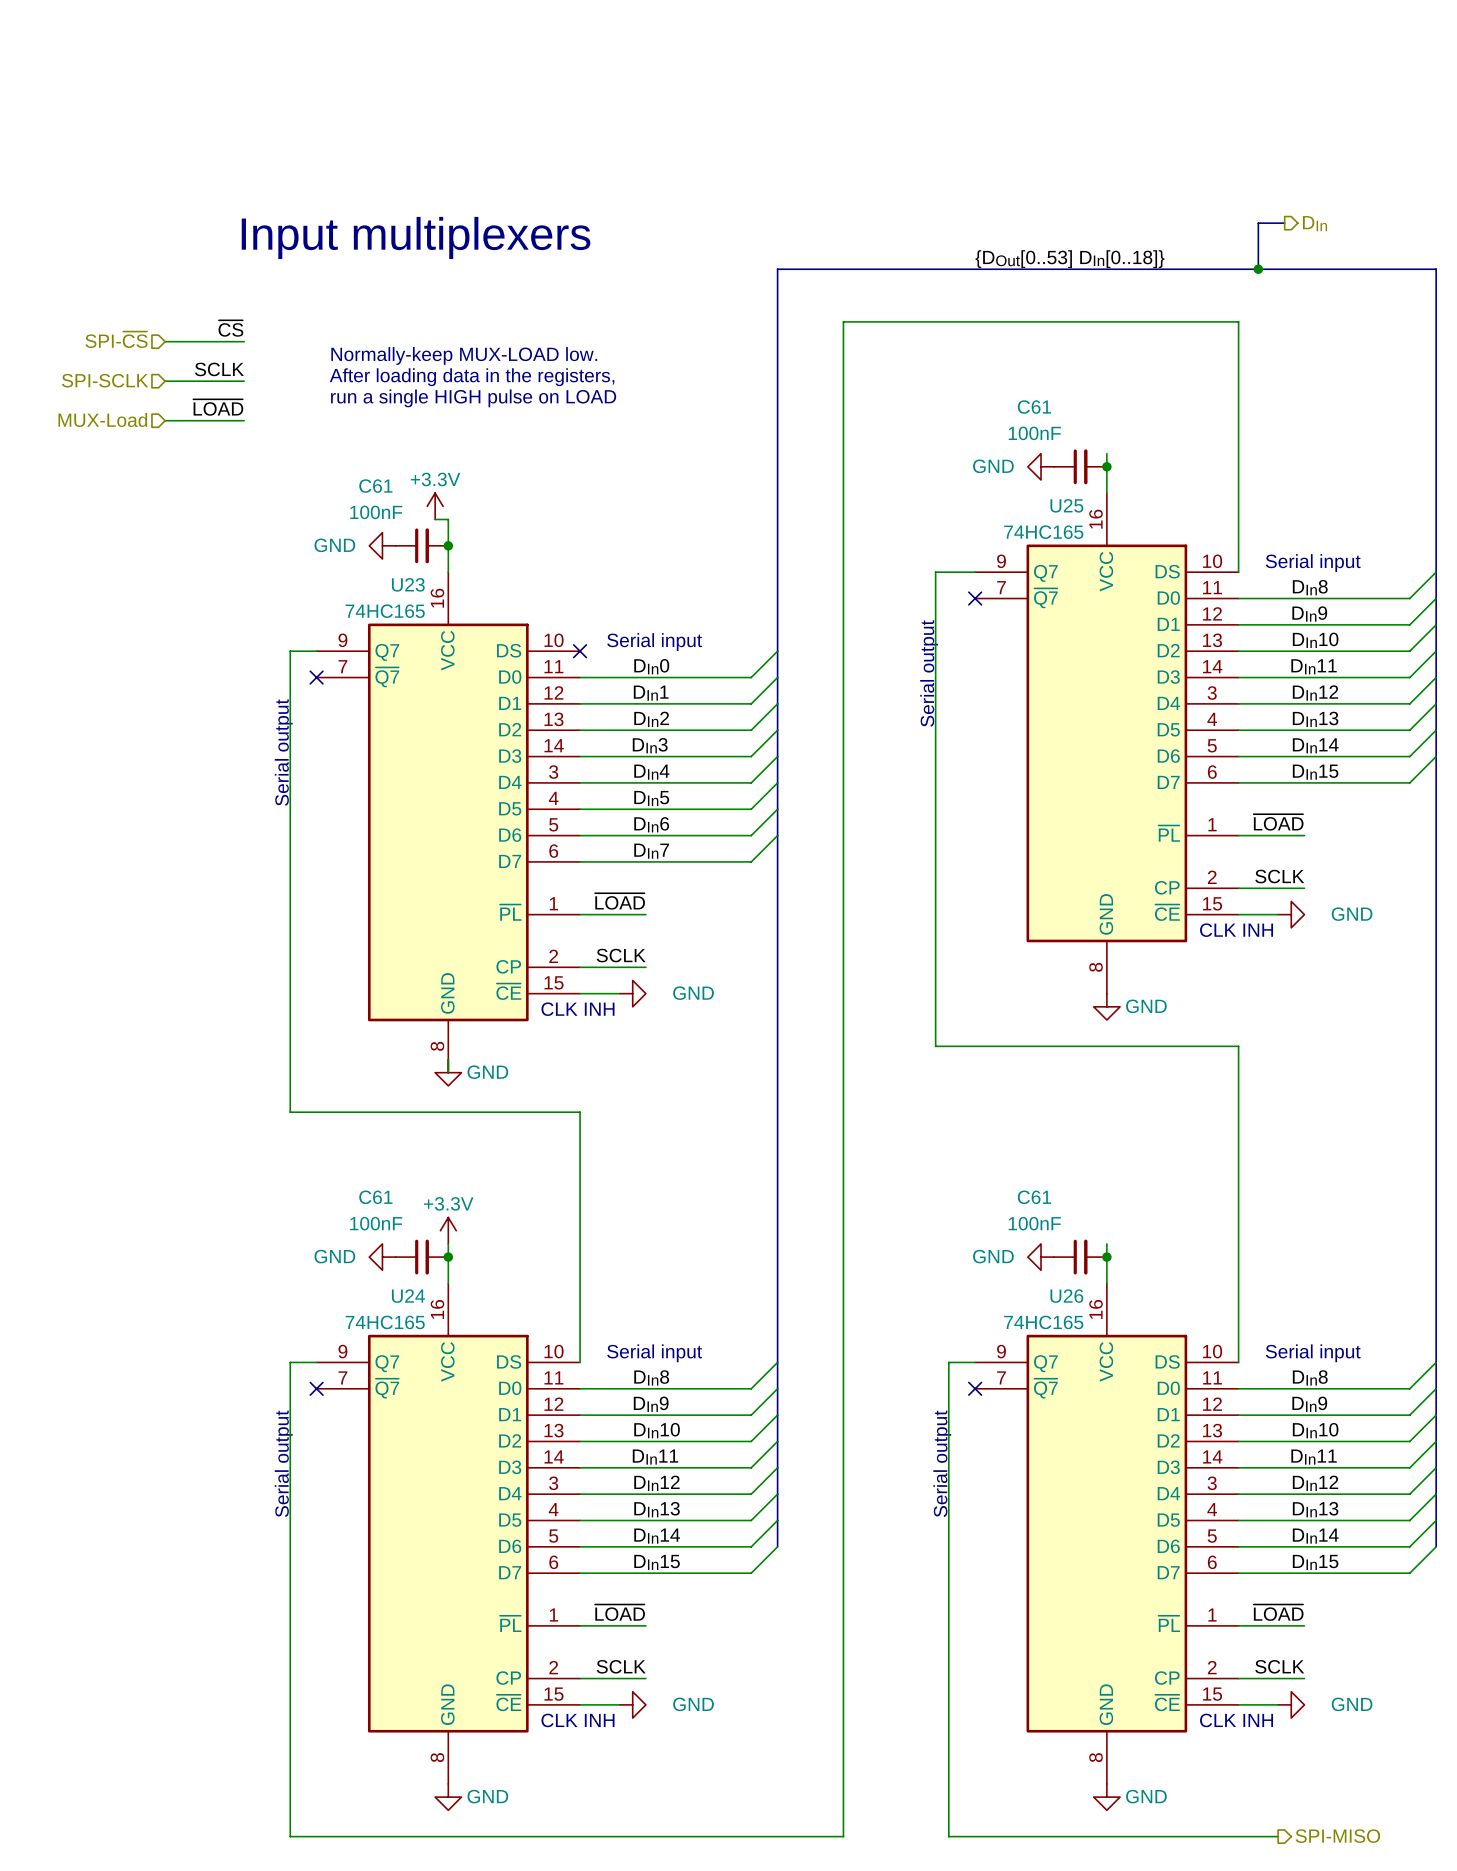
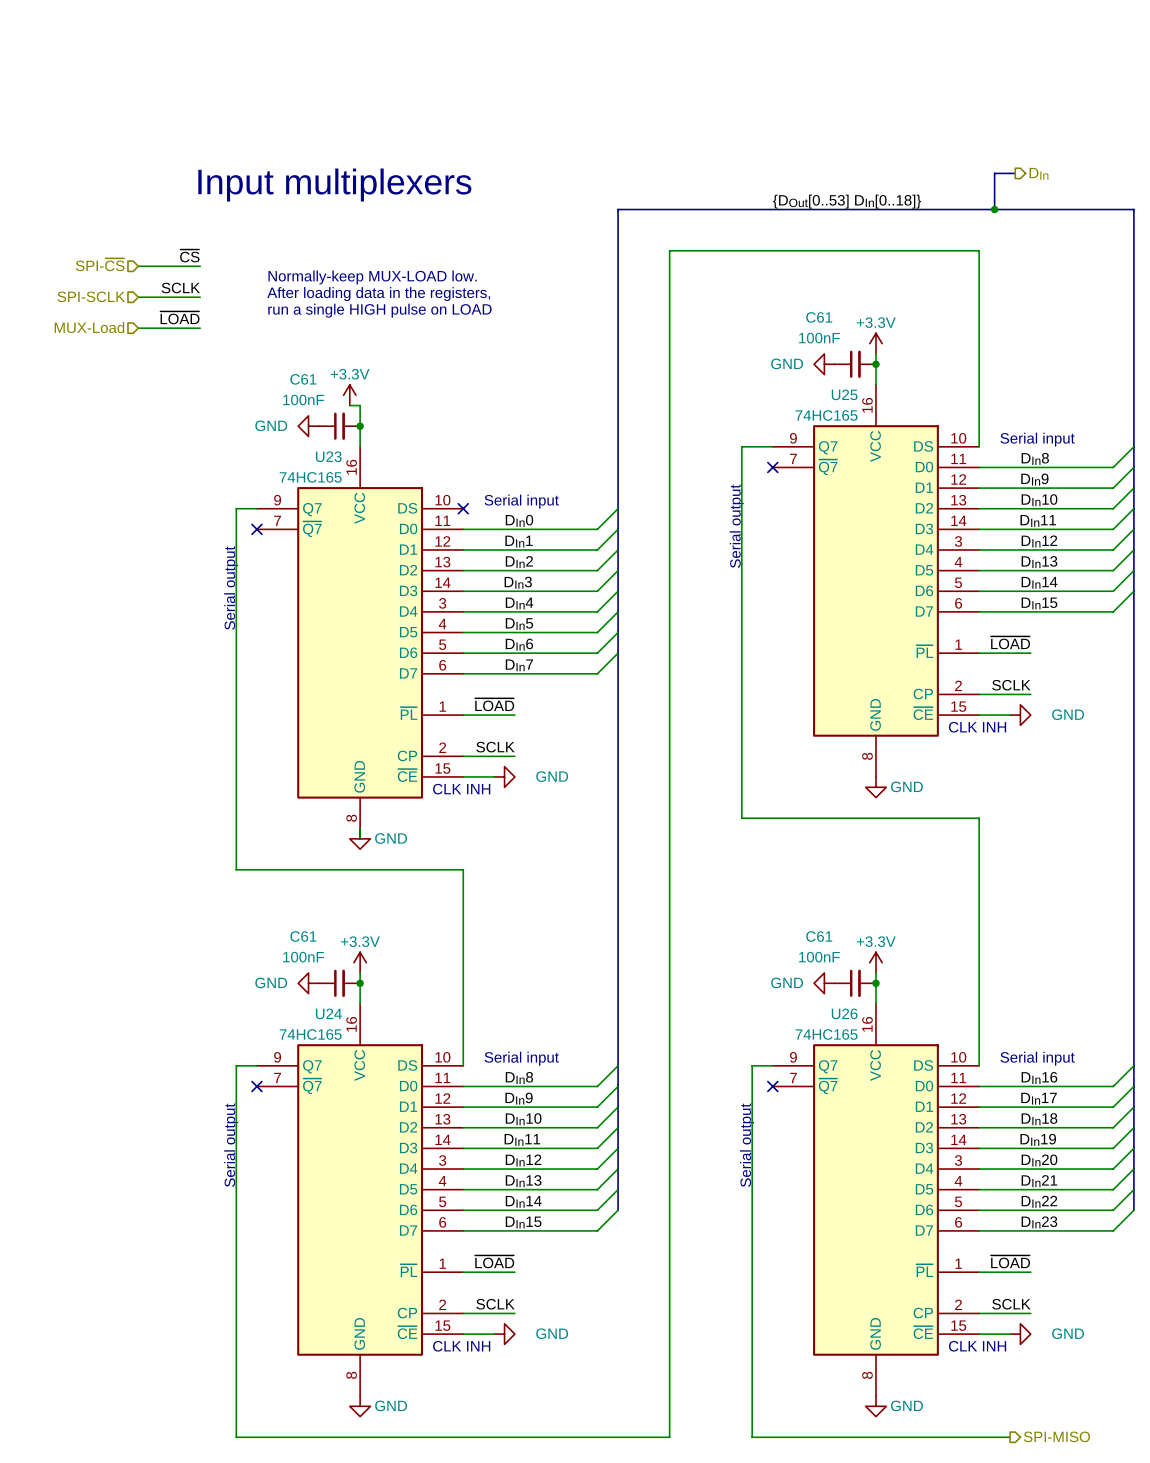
power symbol: none -> +3.3V (875, 343)
power symbol: none -> +3.3V (875, 962)
label: DIn8 (1310, 1377) -> DIn16 (1039, 1077)
label: DIn9 (1309, 1404) -> DIn17 (1039, 1098)
label: DIn10 (1315, 1430) -> DIn18 (1039, 1119)
label: DIn11 (1314, 1457) -> DIn19 (1038, 1139)
label: DIn12 (1315, 1483) -> DIn20 (1039, 1160)
label: DIn13 (1315, 1509) -> DIn21 (1039, 1181)
label: DIn14 (1315, 1536) -> DIn22 (1039, 1201)
label: DIn15 (1315, 1562) -> DIn23 (1039, 1222)

